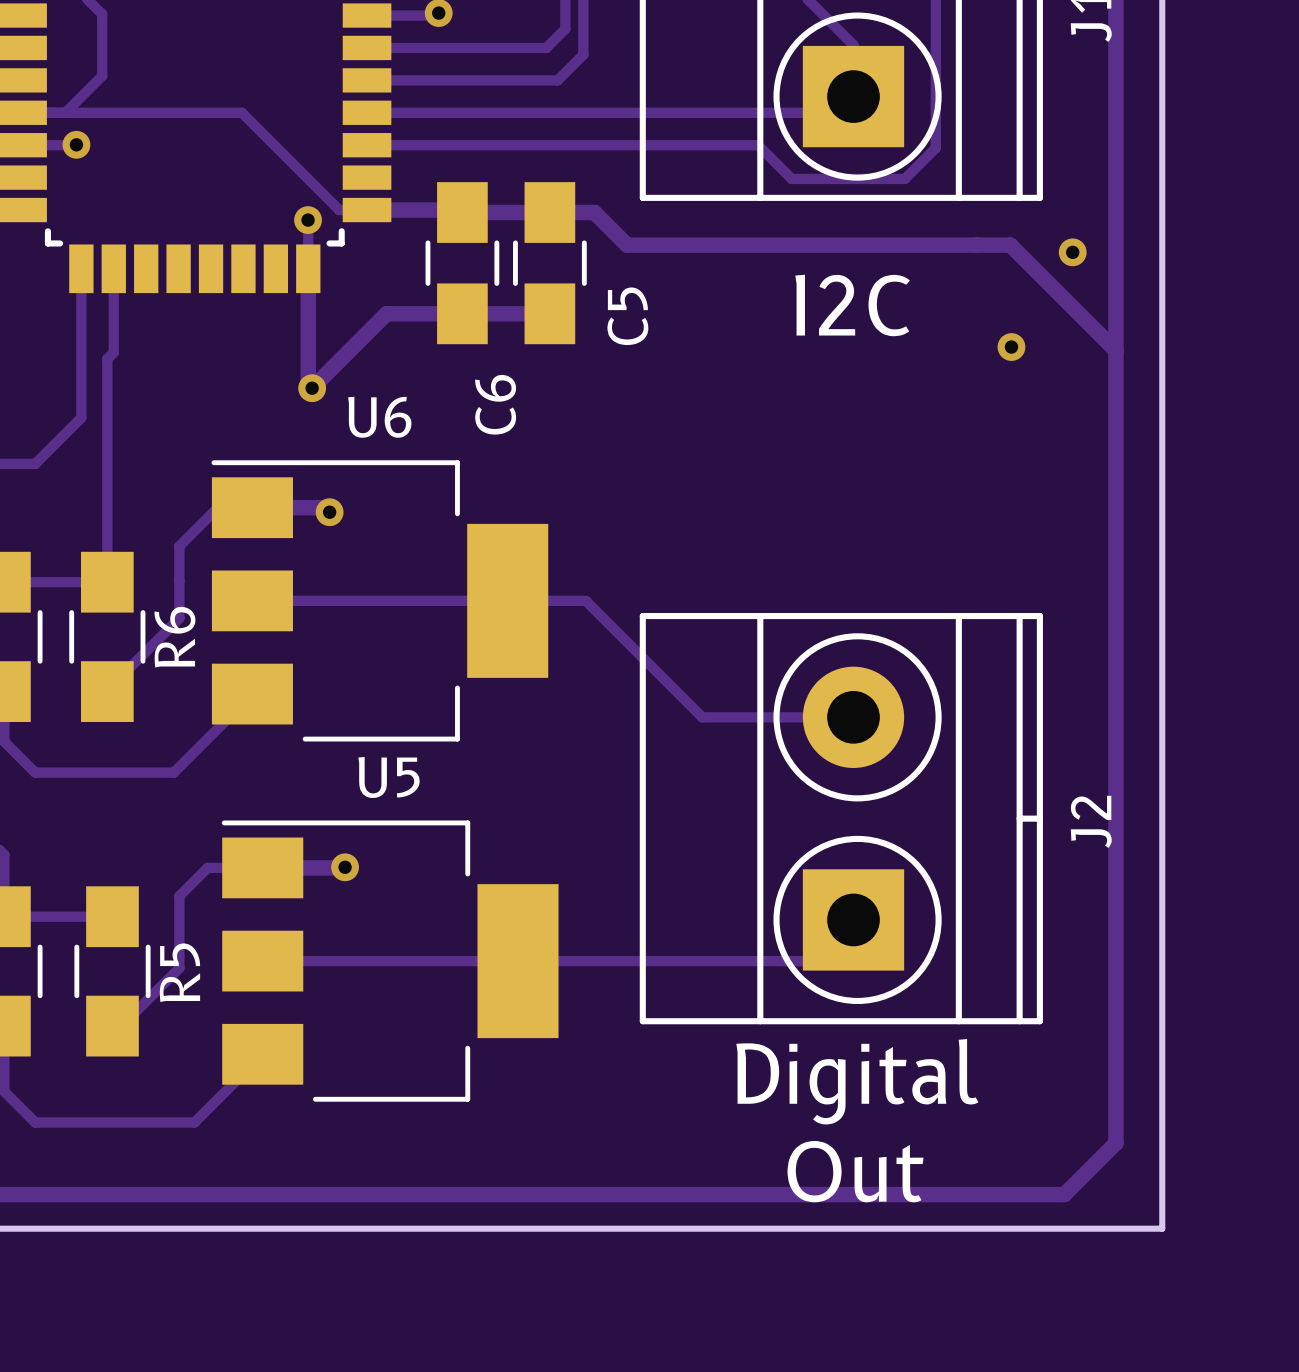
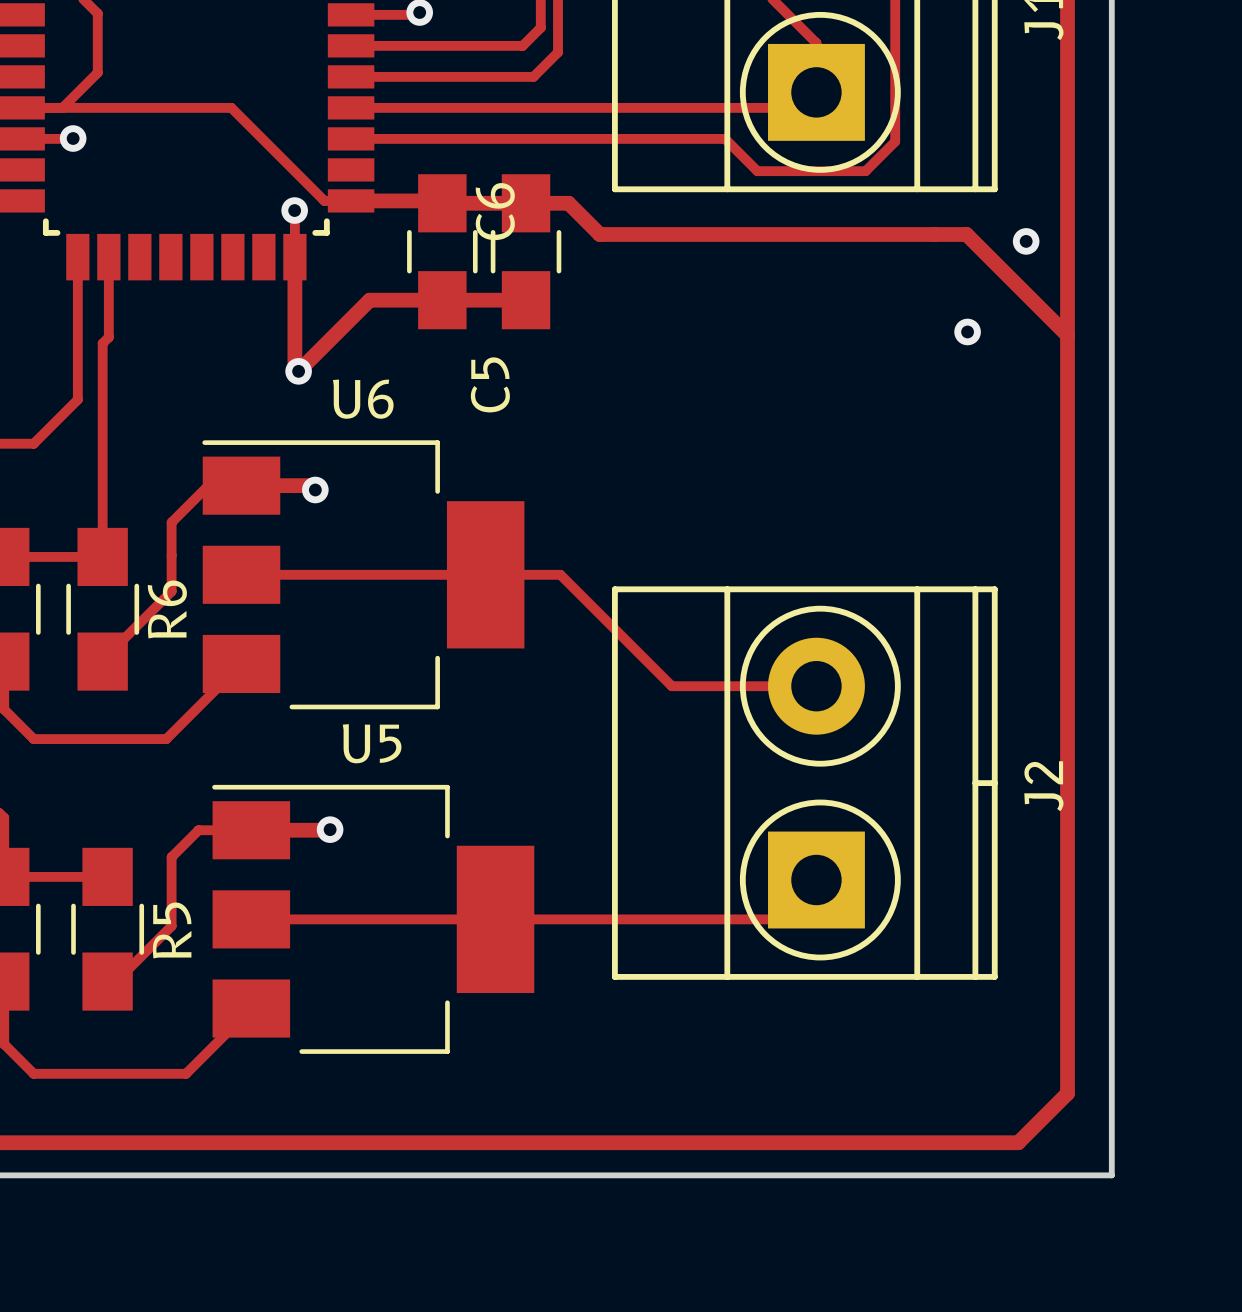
text: I2C (852, 305) -> none
C5 name position: C5 (627, 316) -> C5 (490, 384)
C6 name position: C6 (495, 404) -> C6 (495, 211)
text: Digital (857, 1081) -> none
text: Out (855, 1171) -> none

